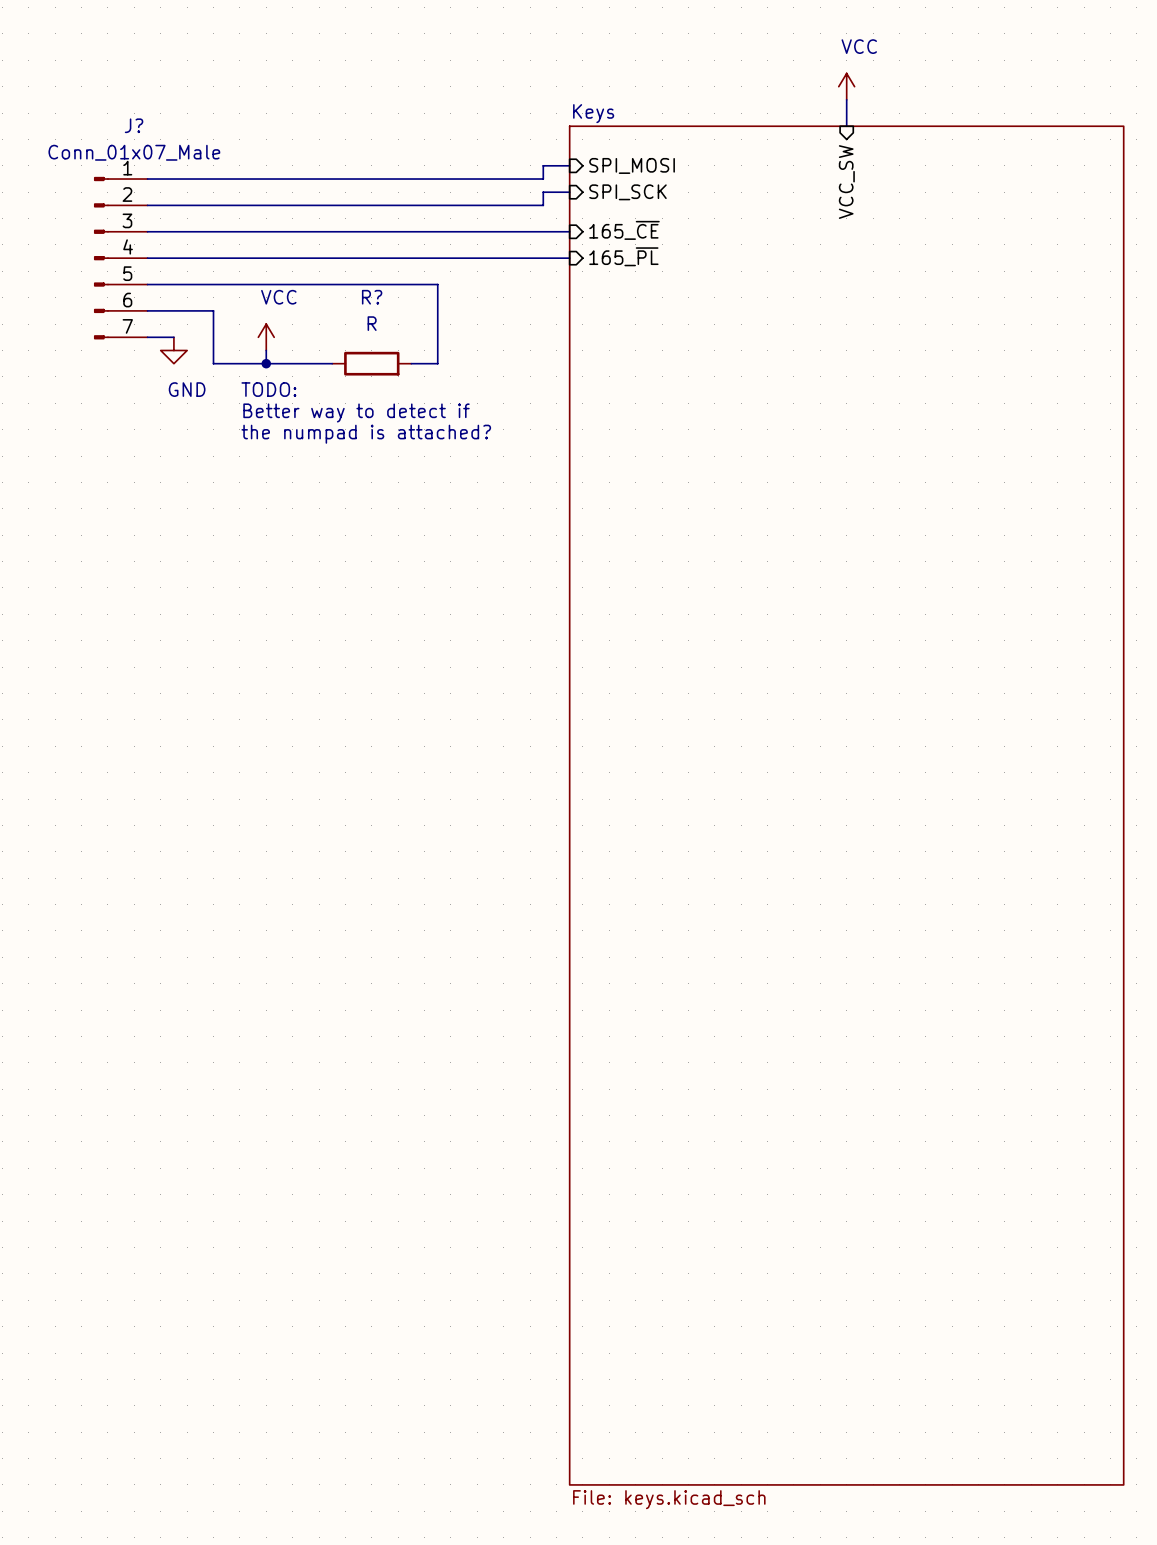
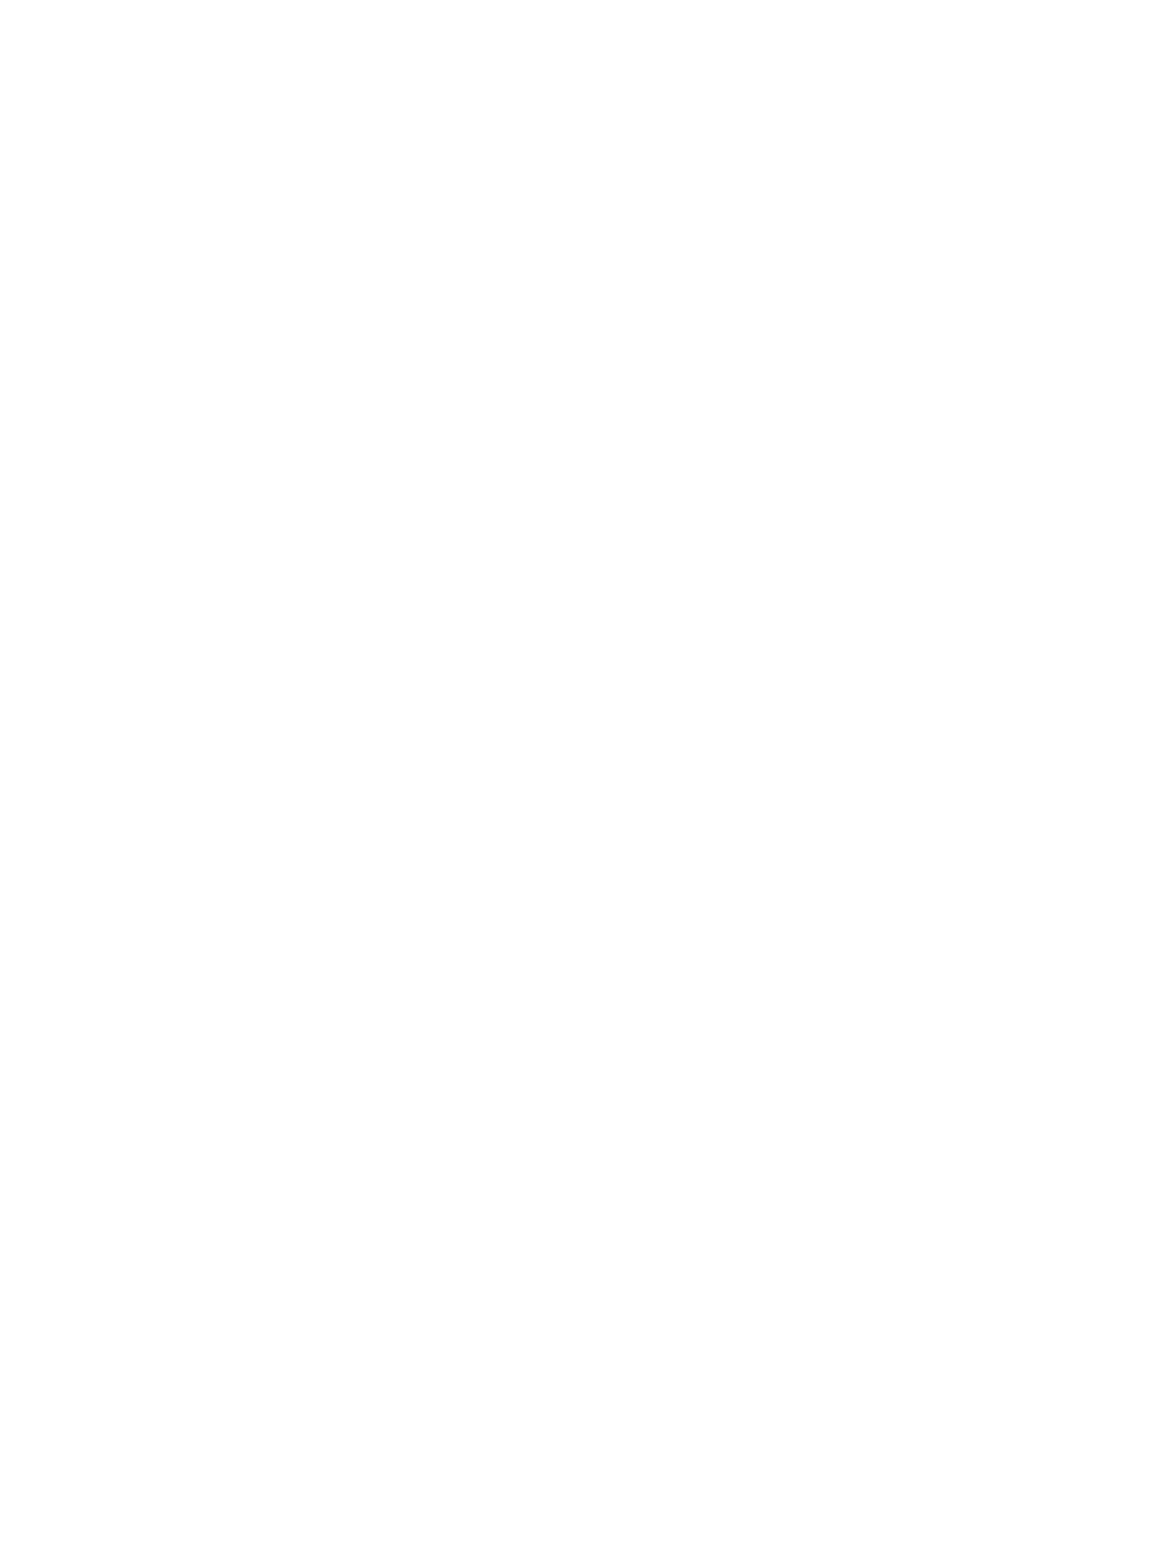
power symbol: VCC (846, 86) -> none
wire: (846, 99) (846, 126) -> none
wire: (569, 165) (543, 165) (543, 179) (147, 179) -> none
sheet pin: SPI_MOSI (632, 165) -> none
sheet pin: VCC_SW (846, 182) -> none
wire: (569, 192) (543, 192) (543, 205) (147, 205) -> none
sheet pin: SPI_SCK (627, 192) -> none
sheet pin: 165_~{CE} (624, 230) -> none
wire: (147, 231) (569, 231) -> none
sheet pin: 165_~{PL} (623, 256) -> none
J?: Conn_01x07_Male (120, 258) -> none
wire: (147, 258) (569, 258) -> none
wire: (147, 284) (437, 284) (437, 363) (411, 363) -> none
wire: (147, 310) (213, 310) (213, 363) (332, 363) -> none
wire: (147, 337) (173, 337) -> none
power symbol: VCC (266, 337) -> none
power symbol: GND (173, 350) -> none
wire: (266, 350) (266, 363) -> none
junction: (266, 363) -> none
R?: R (371, 363) -> none
text: TODO: (268, 389) -> none
text: Better way to detect if (356, 412) -> none
text: the numpad is attached? (366, 434) -> none
sheet Keys: File: keys.kicad_sch (846, 805) -> none

